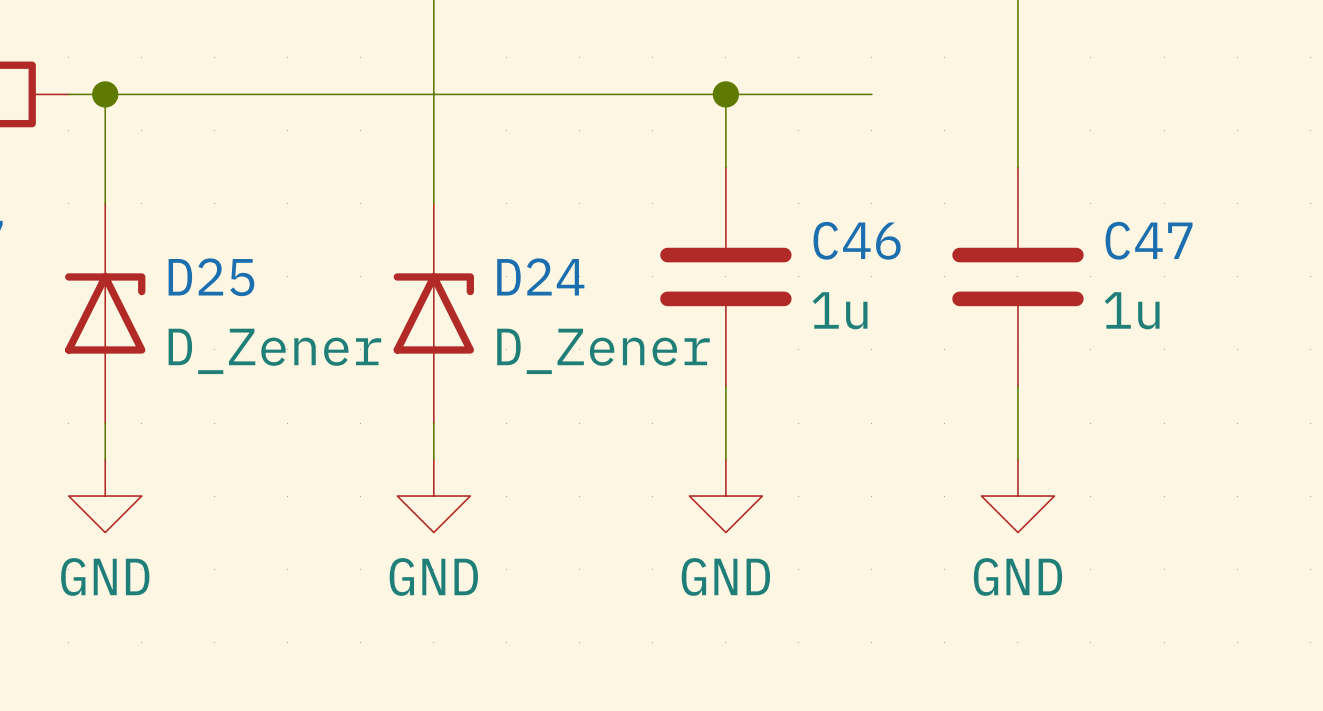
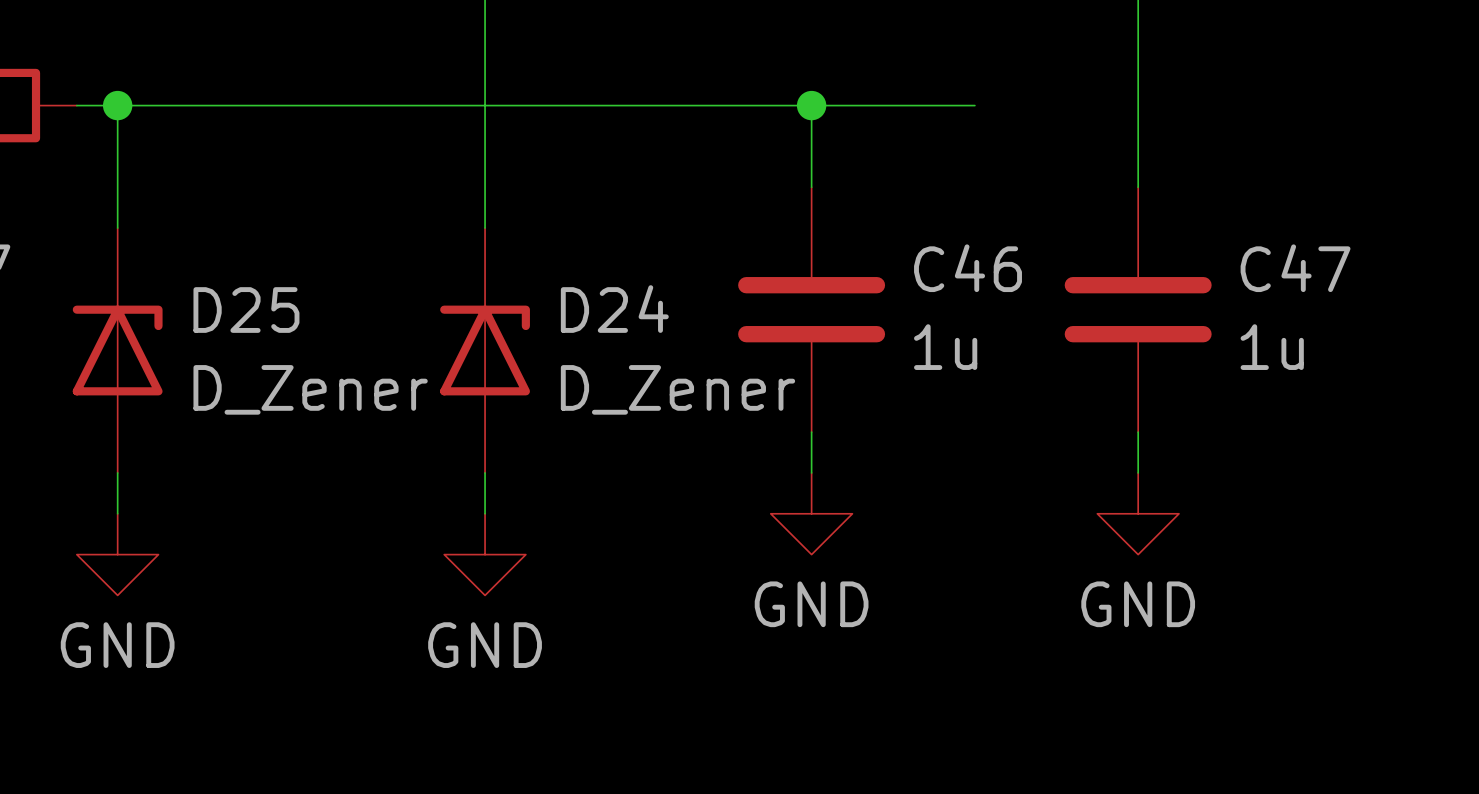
power symbol position: GND (725, 496) -> GND (811, 513)
power symbol position: GND (1017, 496) -> GND (1138, 513)

